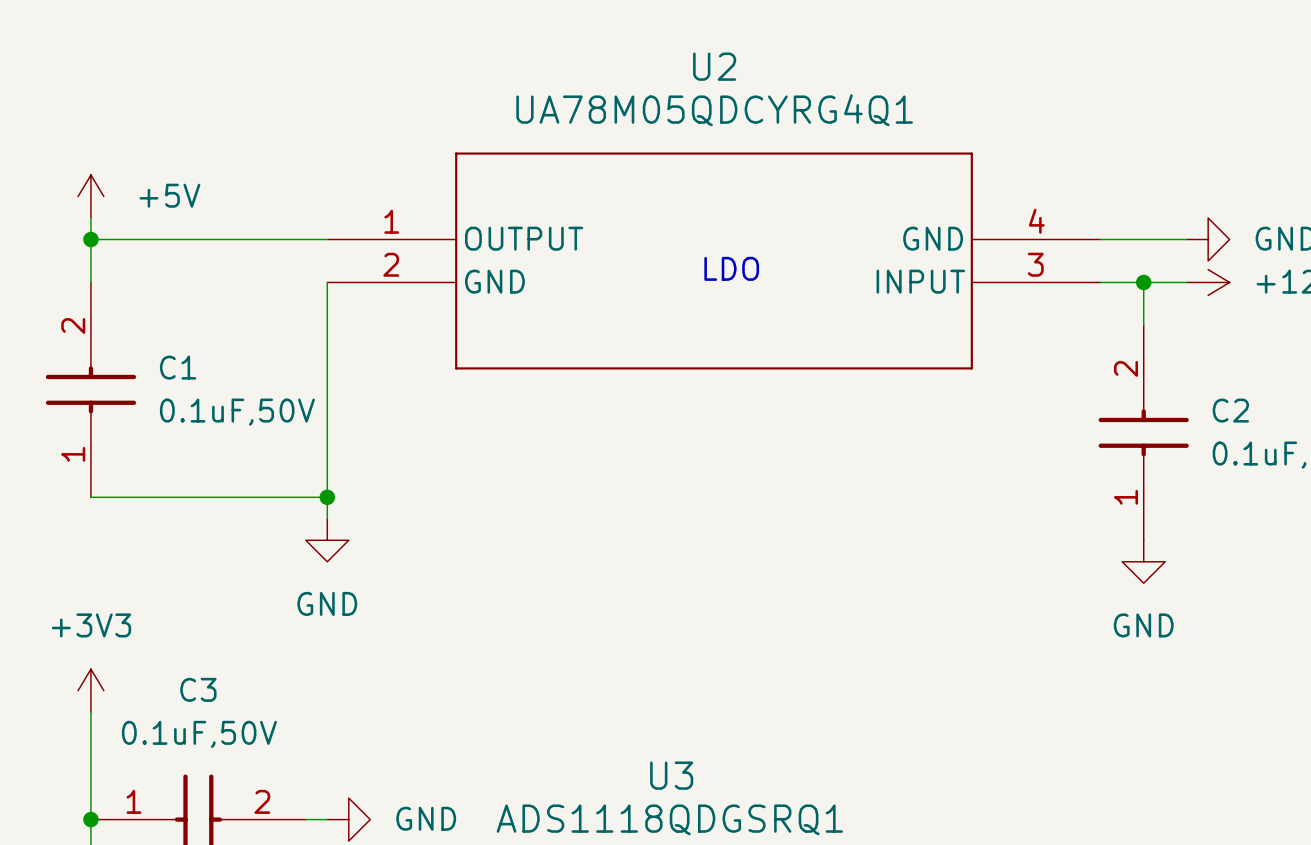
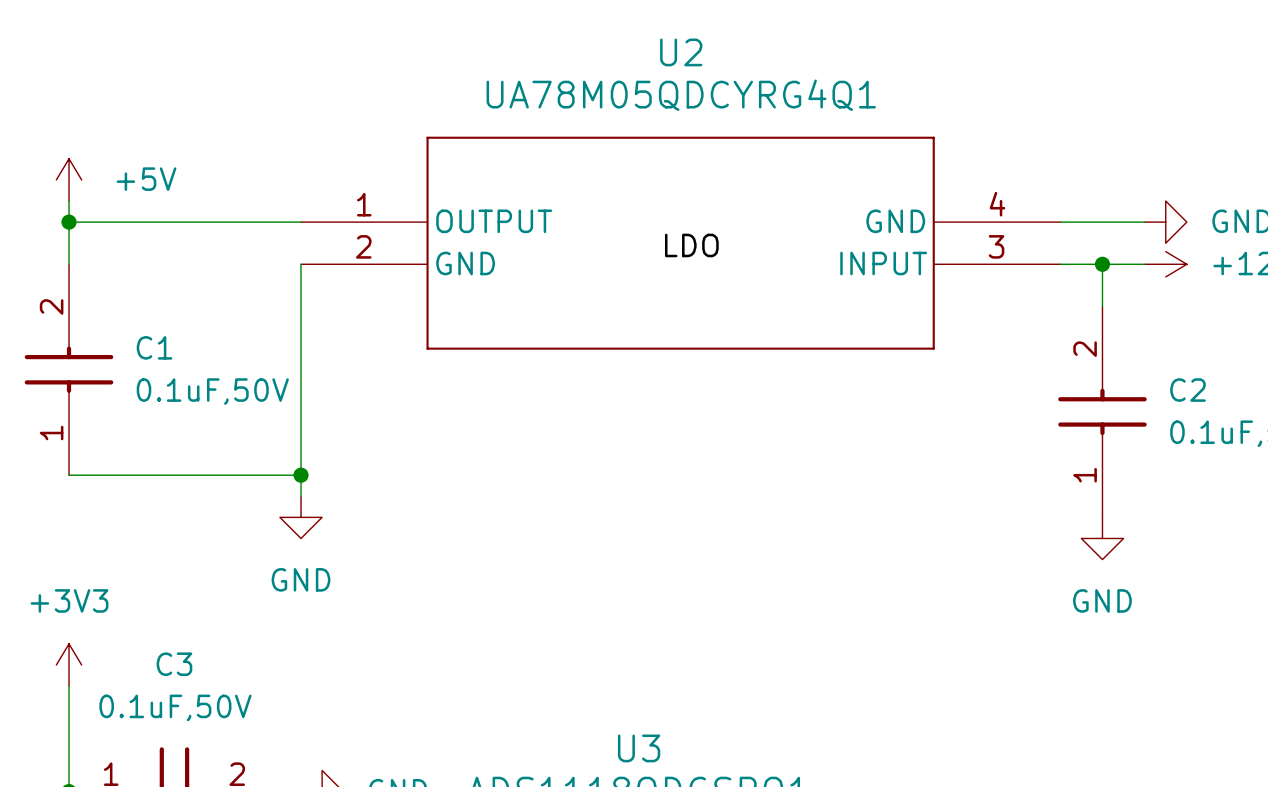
label: none -> LDO (691, 245)
text: LDO (731, 268) -> none

